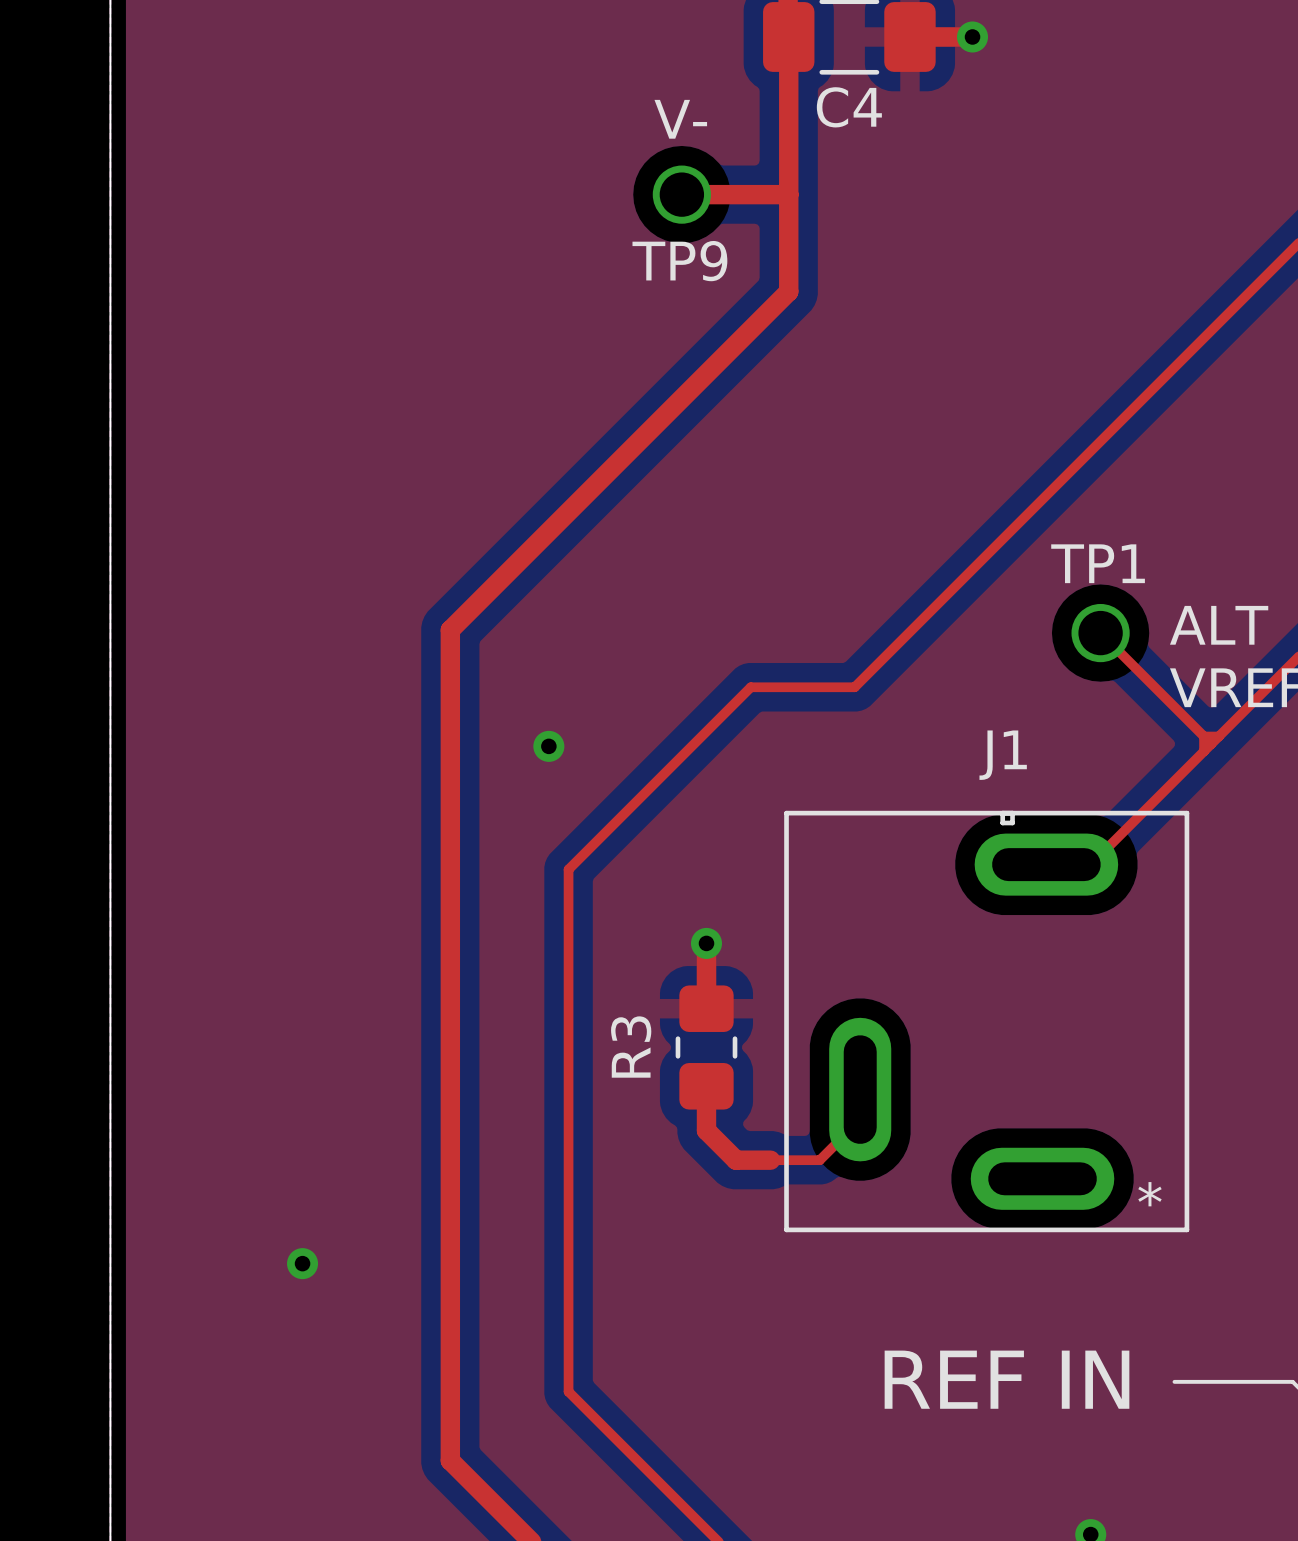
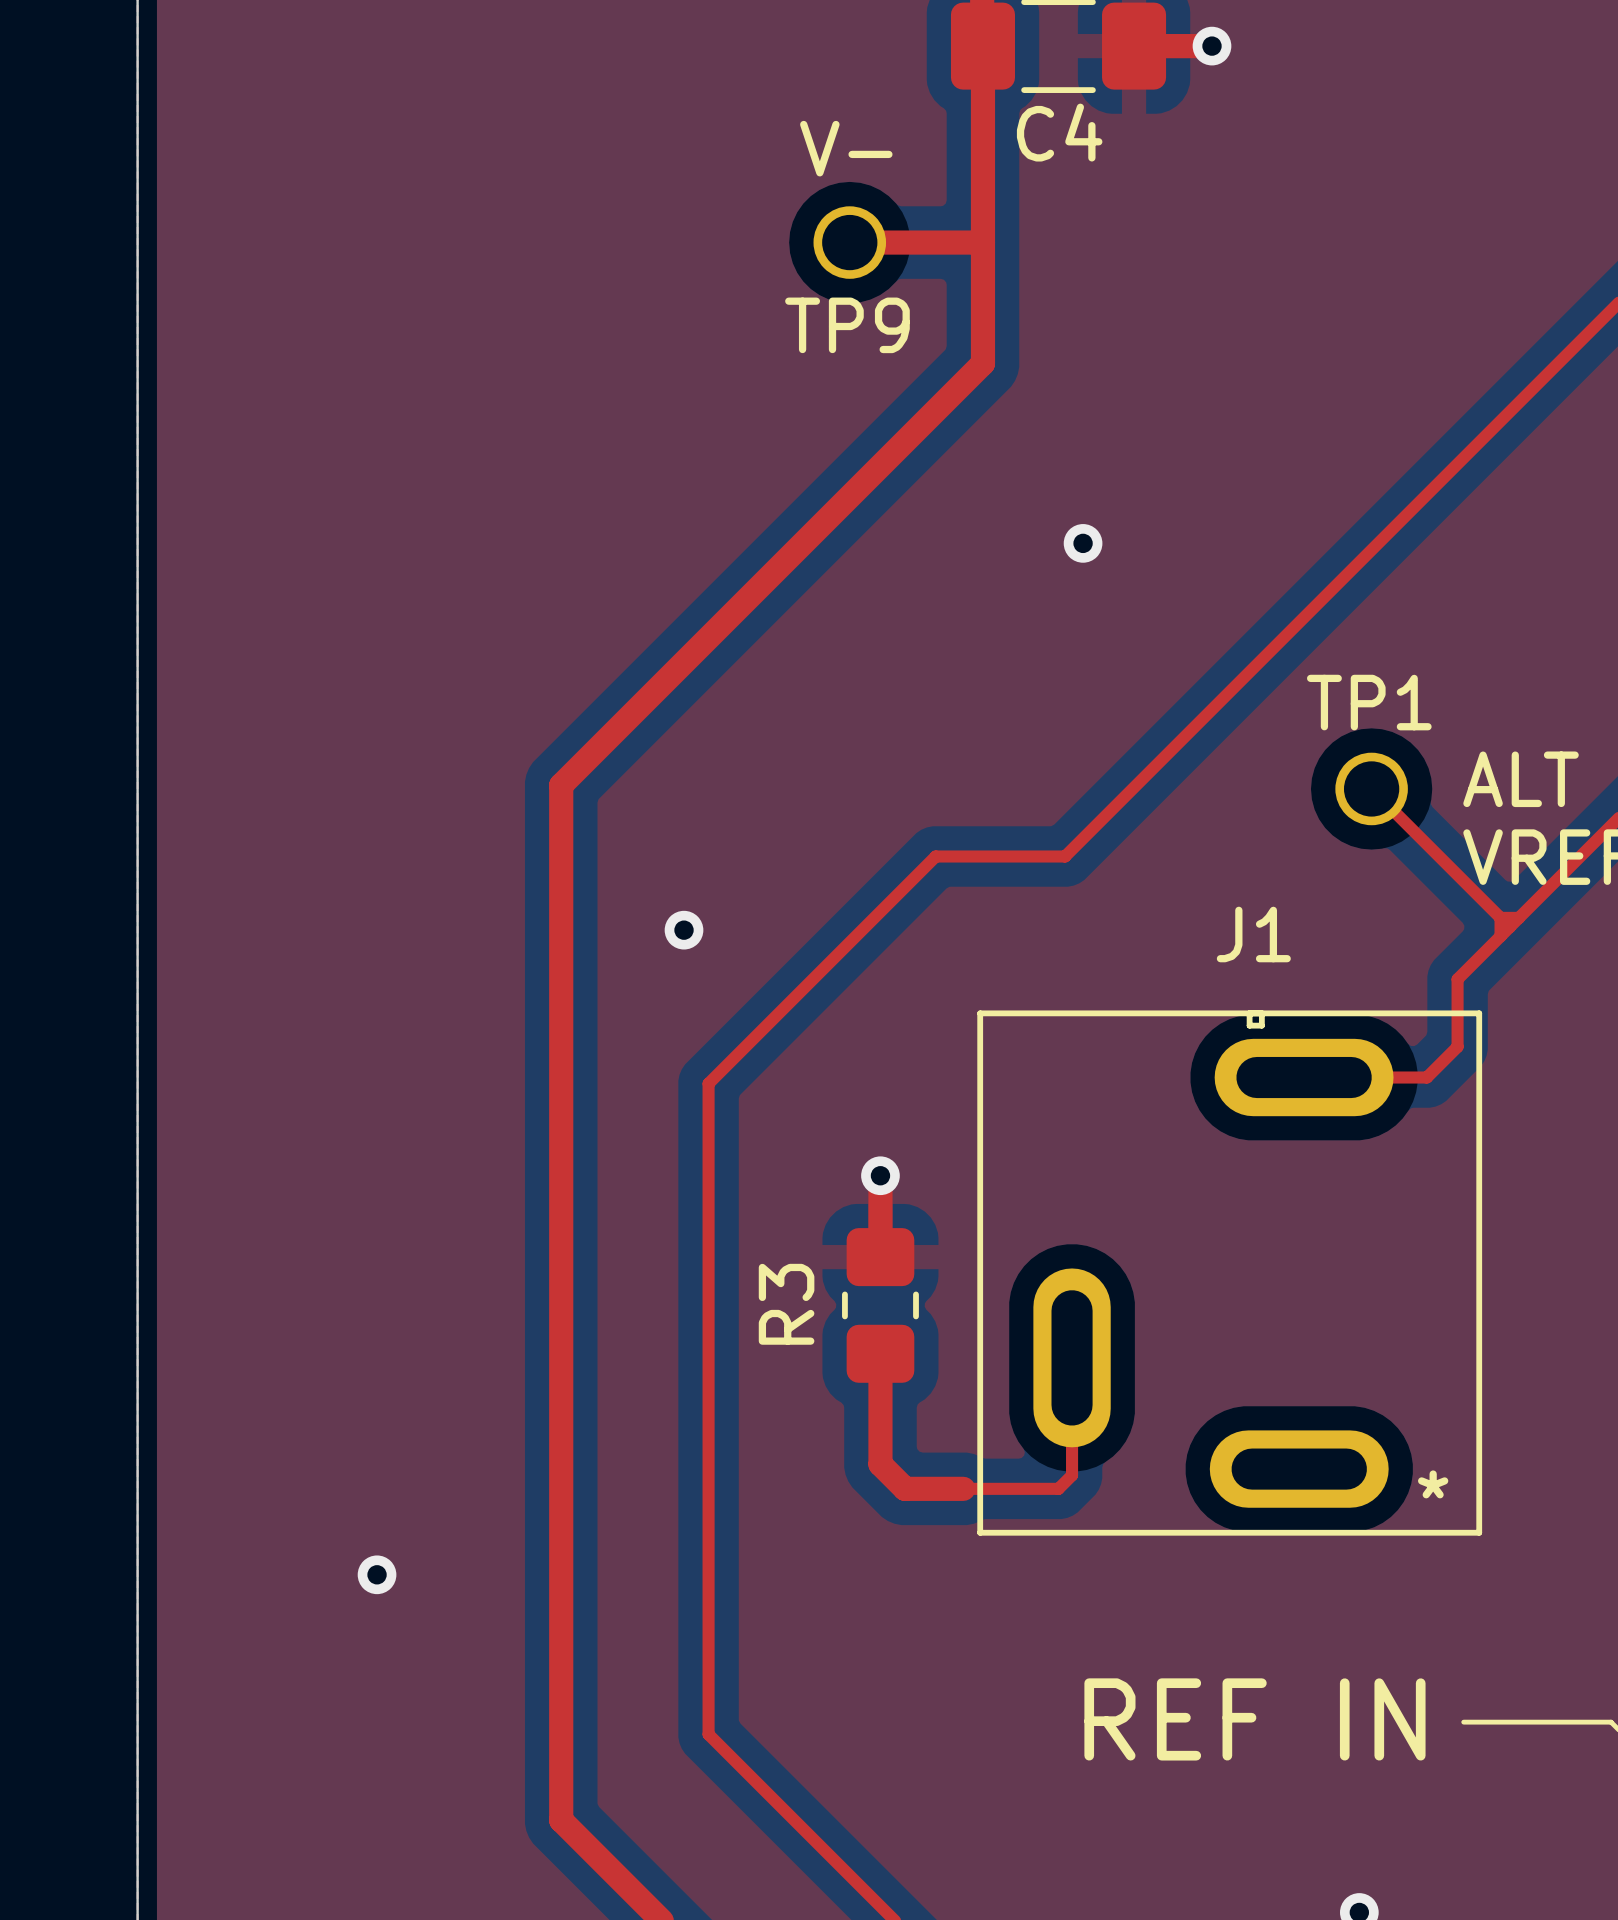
via: none -> (1083, 543)
top track: (1169, 785) (1090, 864) -> (1457, 979) (1457, 1046) (1426, 1077) (1304, 1077)
top track: none -> (1072, 1357) (1072, 1475) (1058, 1488) (966, 1488)
top track: (706, 1130) (736, 1160) (819, 1160) (844, 1135) -> (880, 1409) (880, 1464) (905, 1488) (963, 1488)

